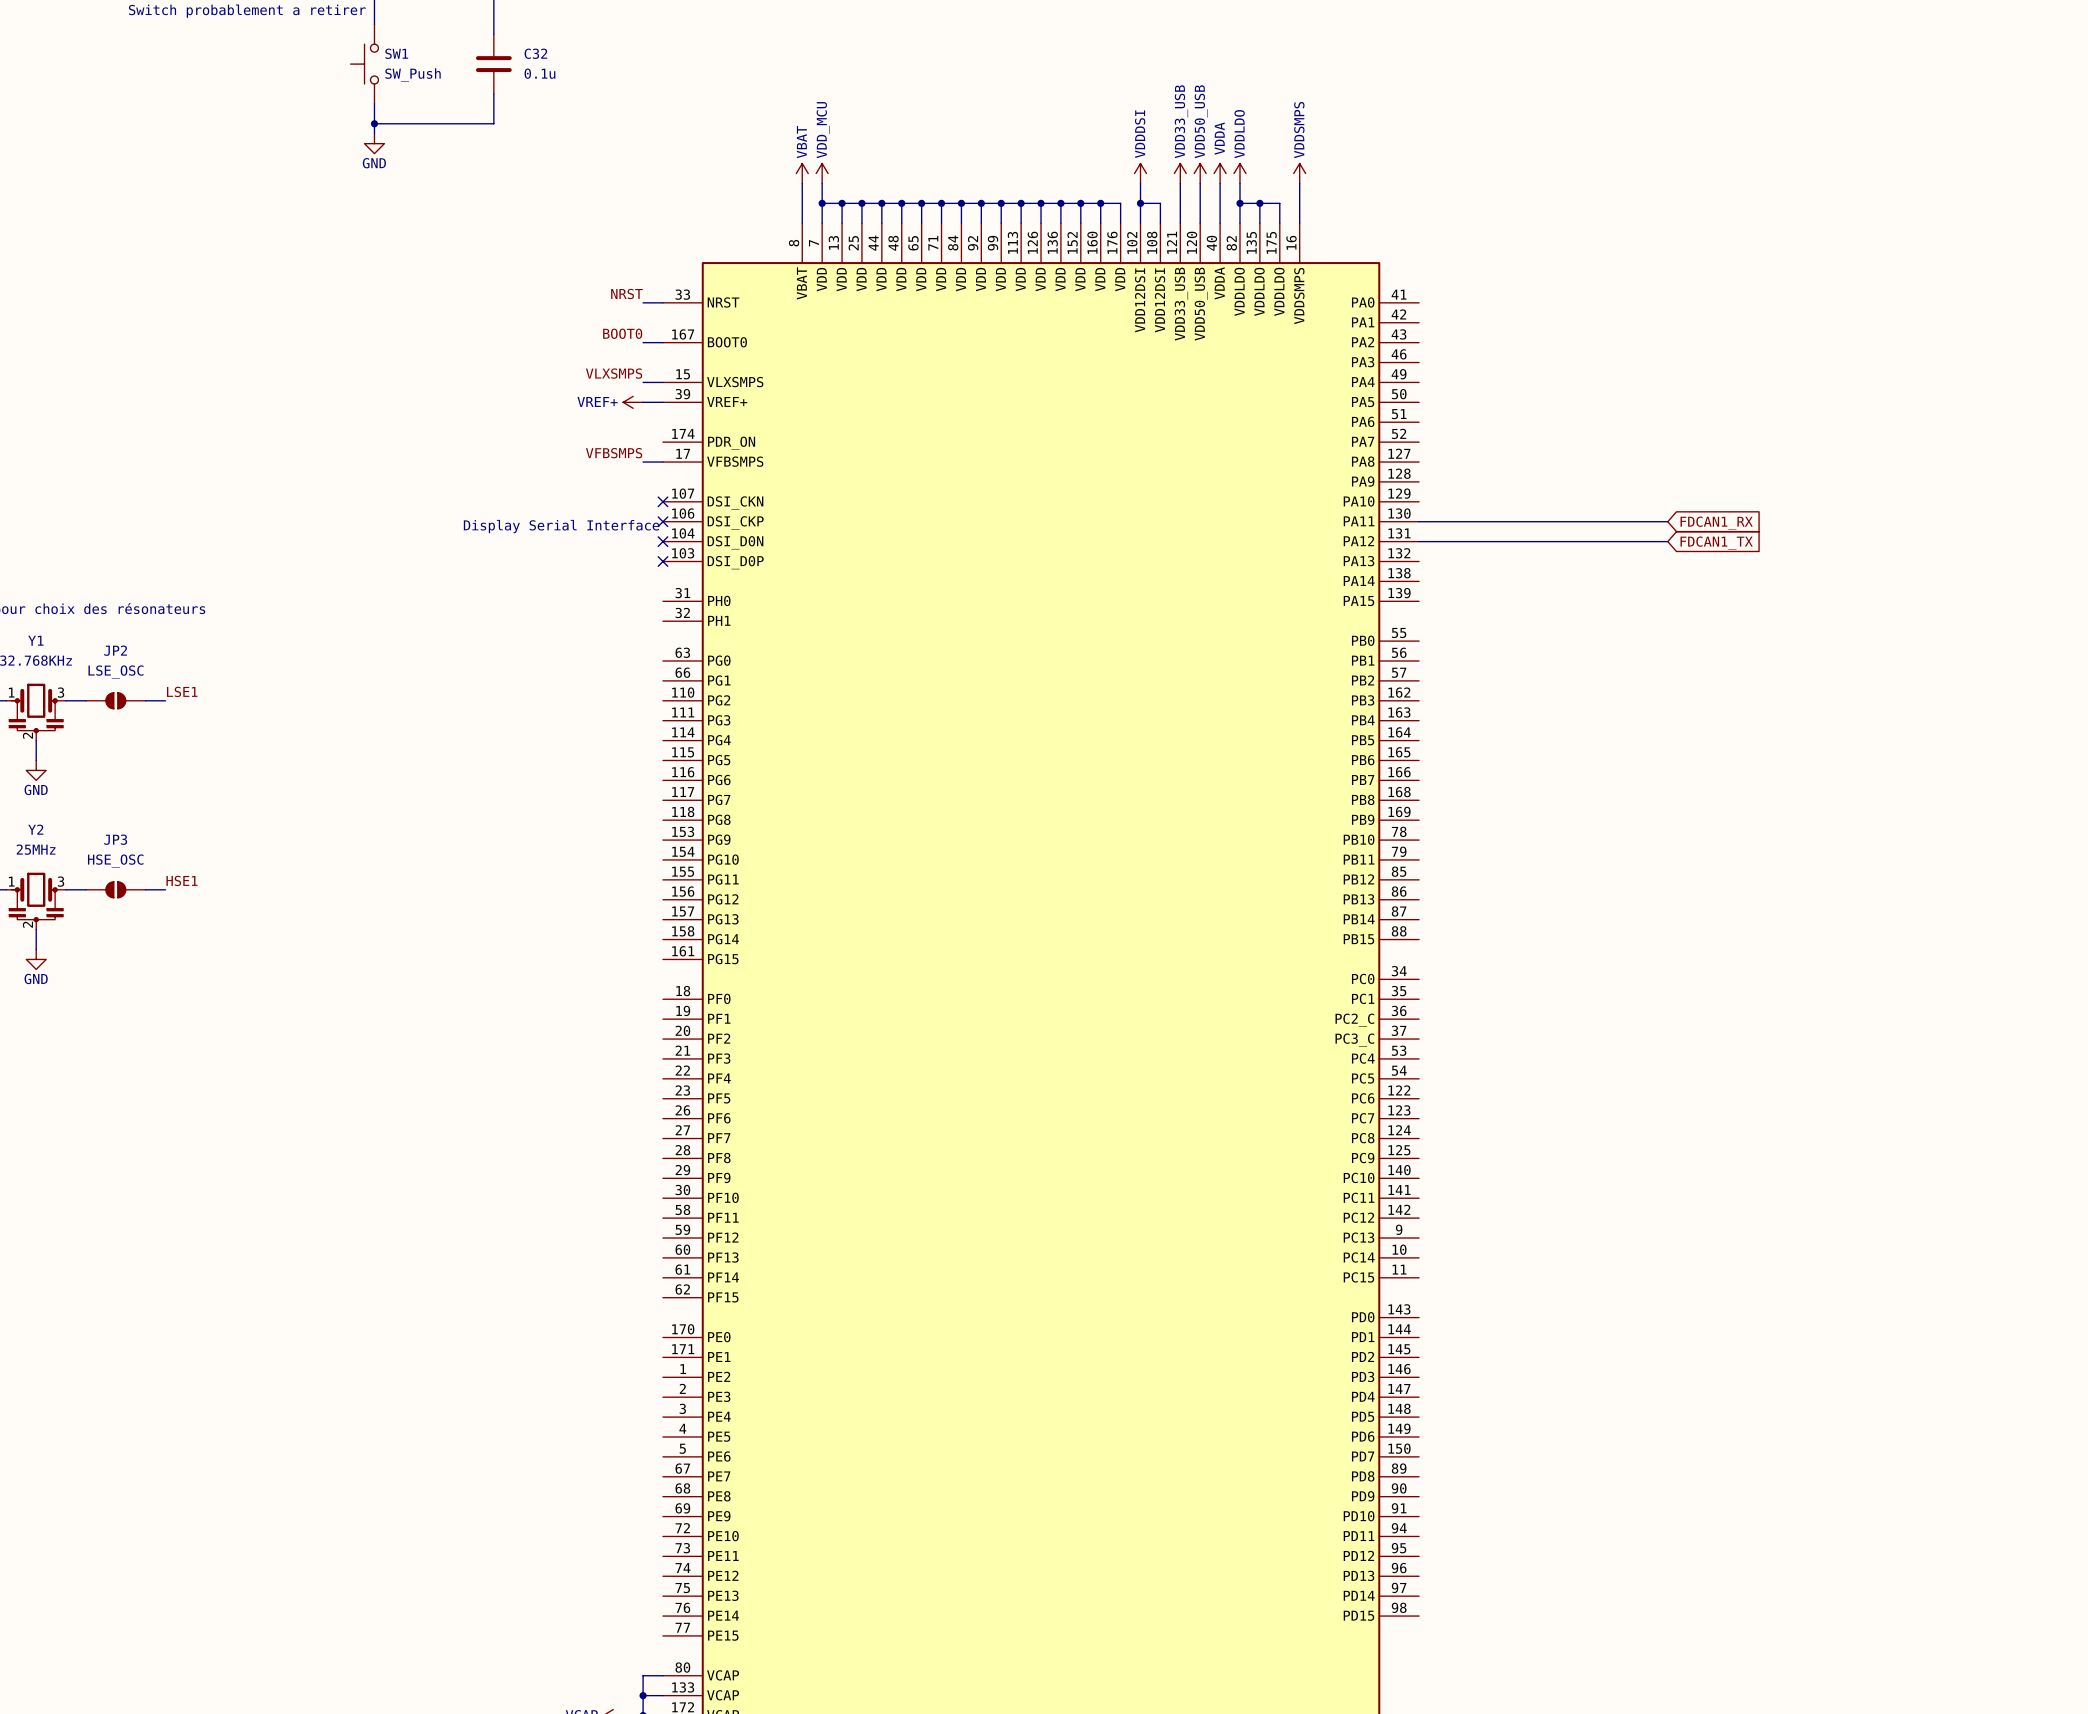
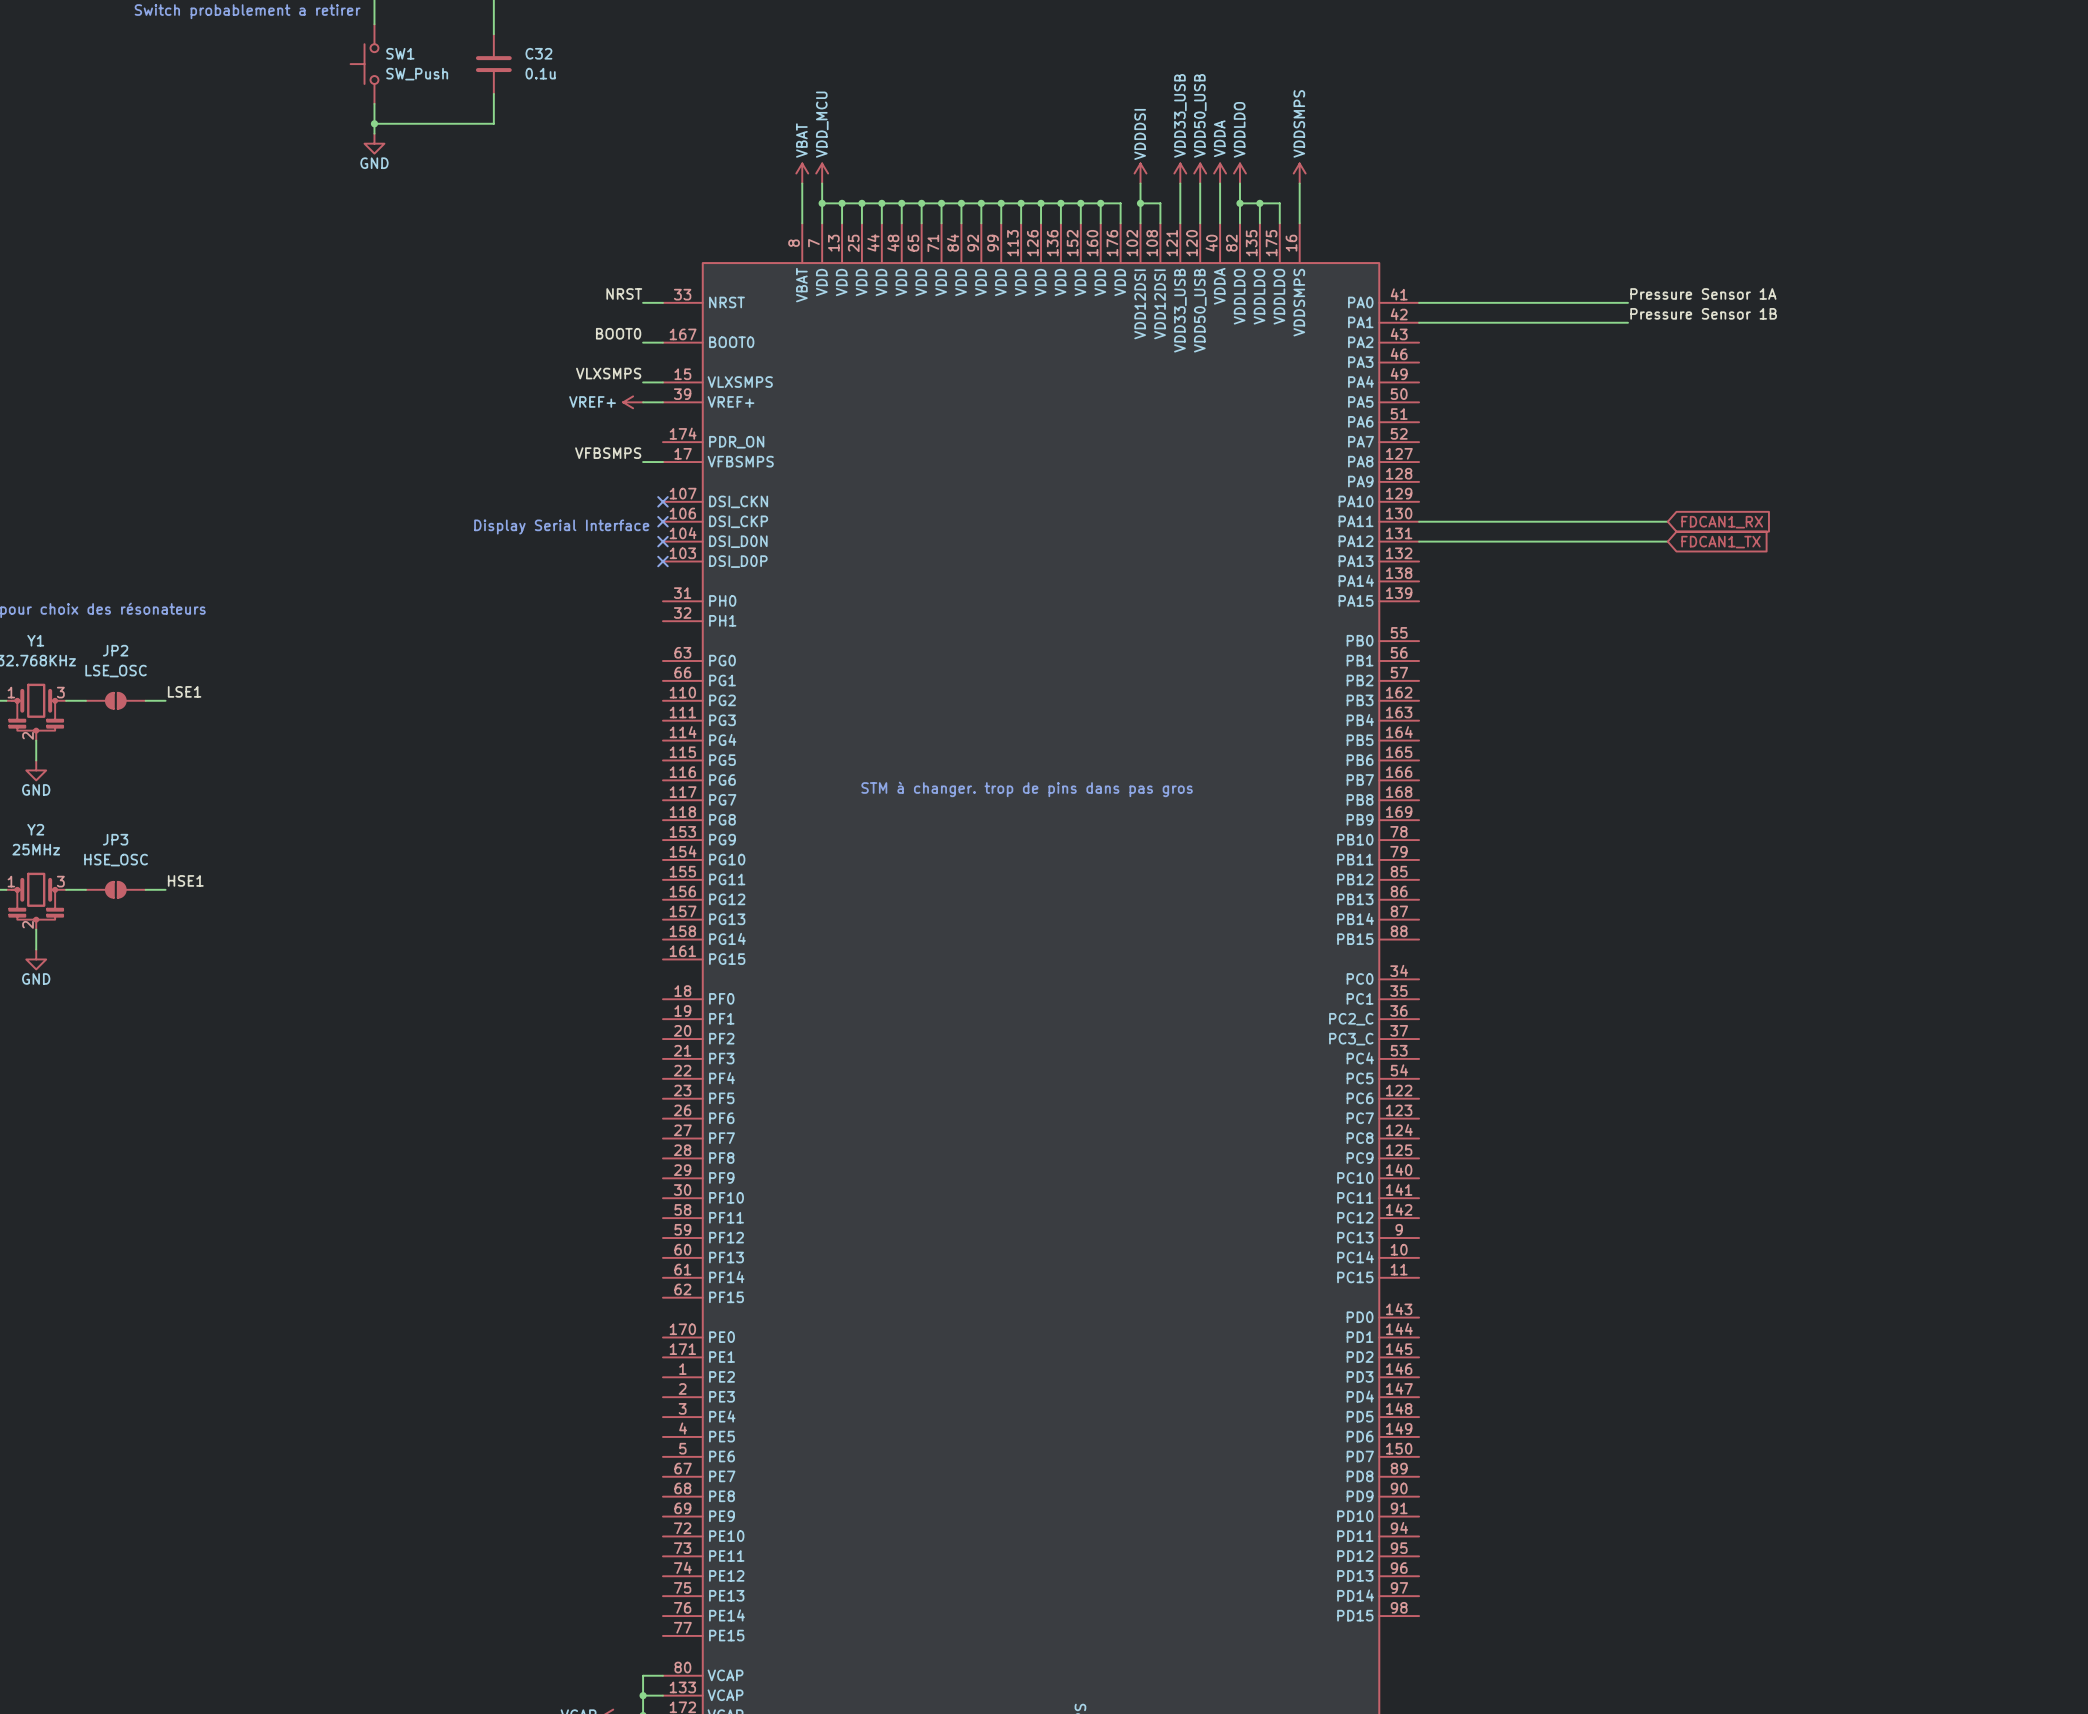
label: none -> Pressure Sensor 1A (1703, 293)
wire: none -> (1419, 302) (1627, 302)
label: none -> Pressure Sensor 1B (1703, 313)
wire: none -> (1419, 322) (1627, 322)
text: none -> STM à changer. trop de pins dans pas gros (1027, 789)

